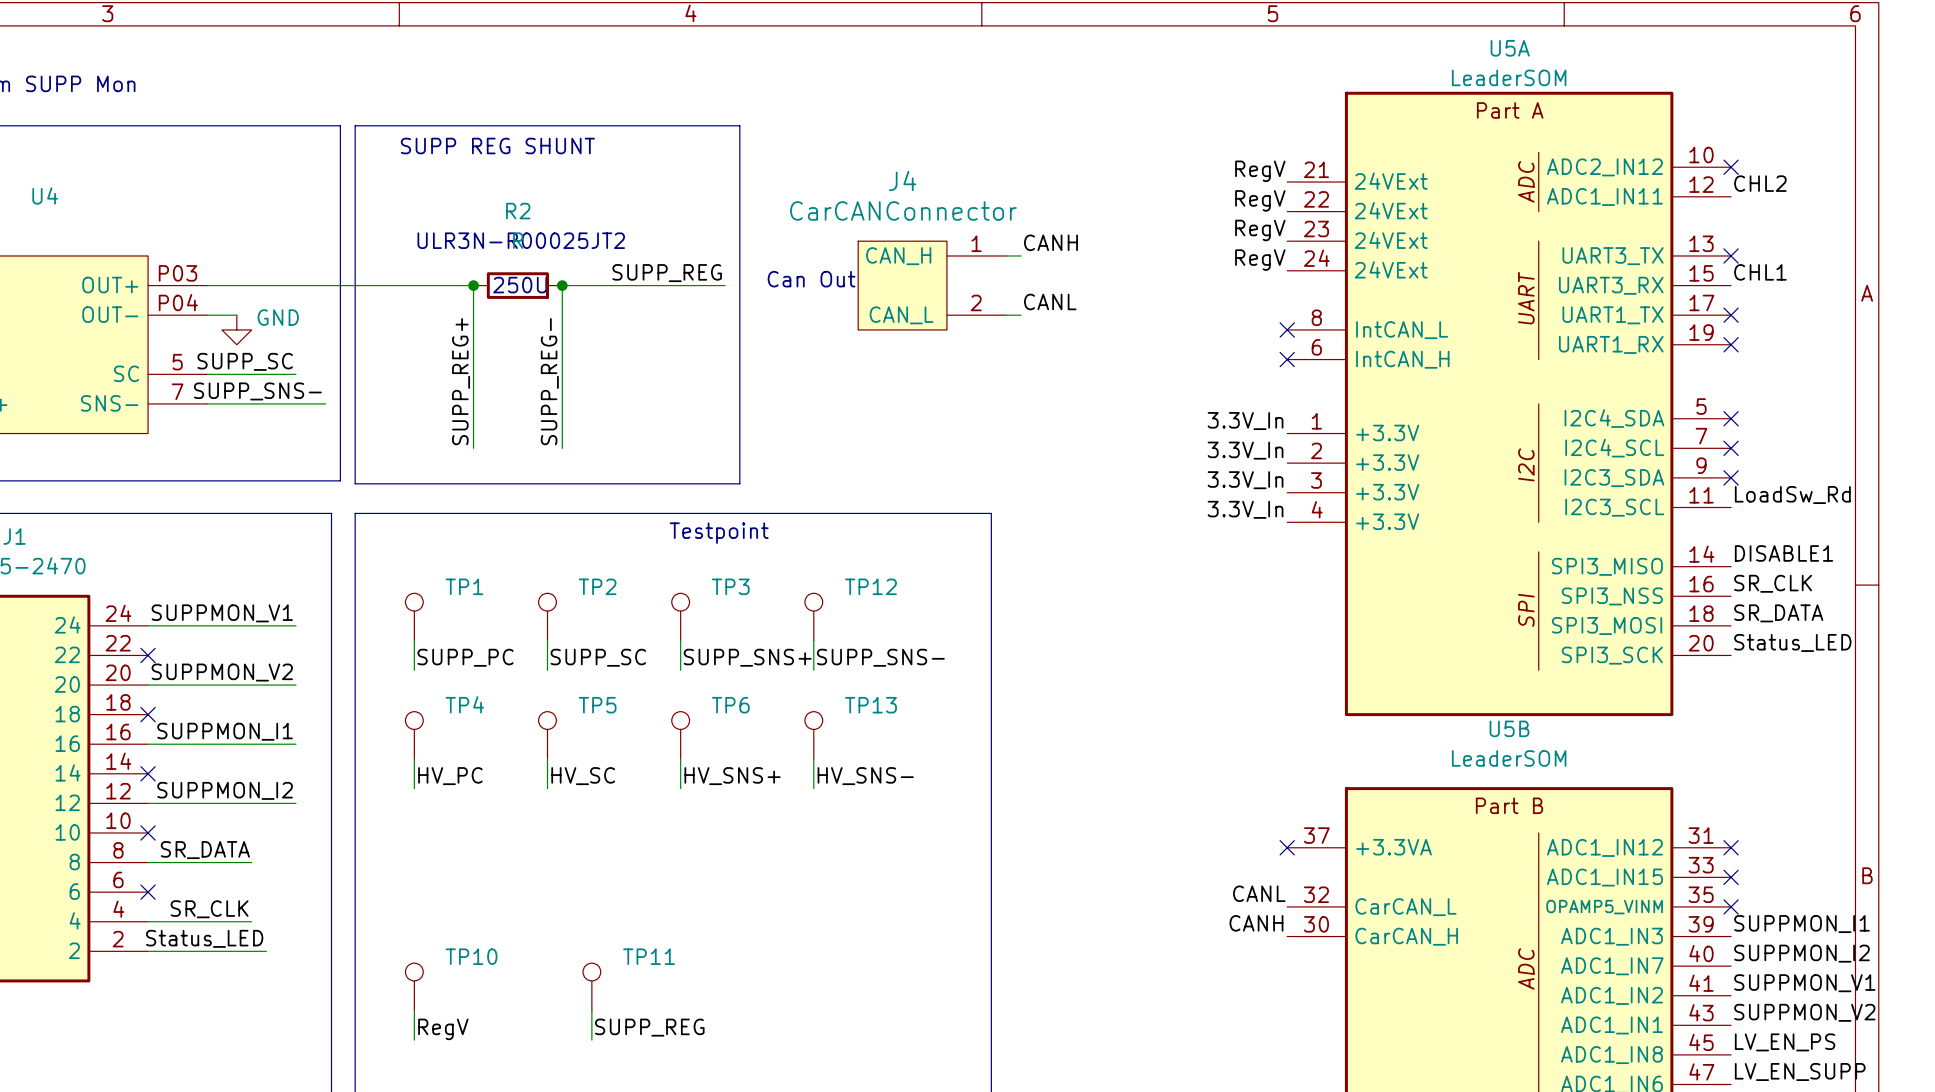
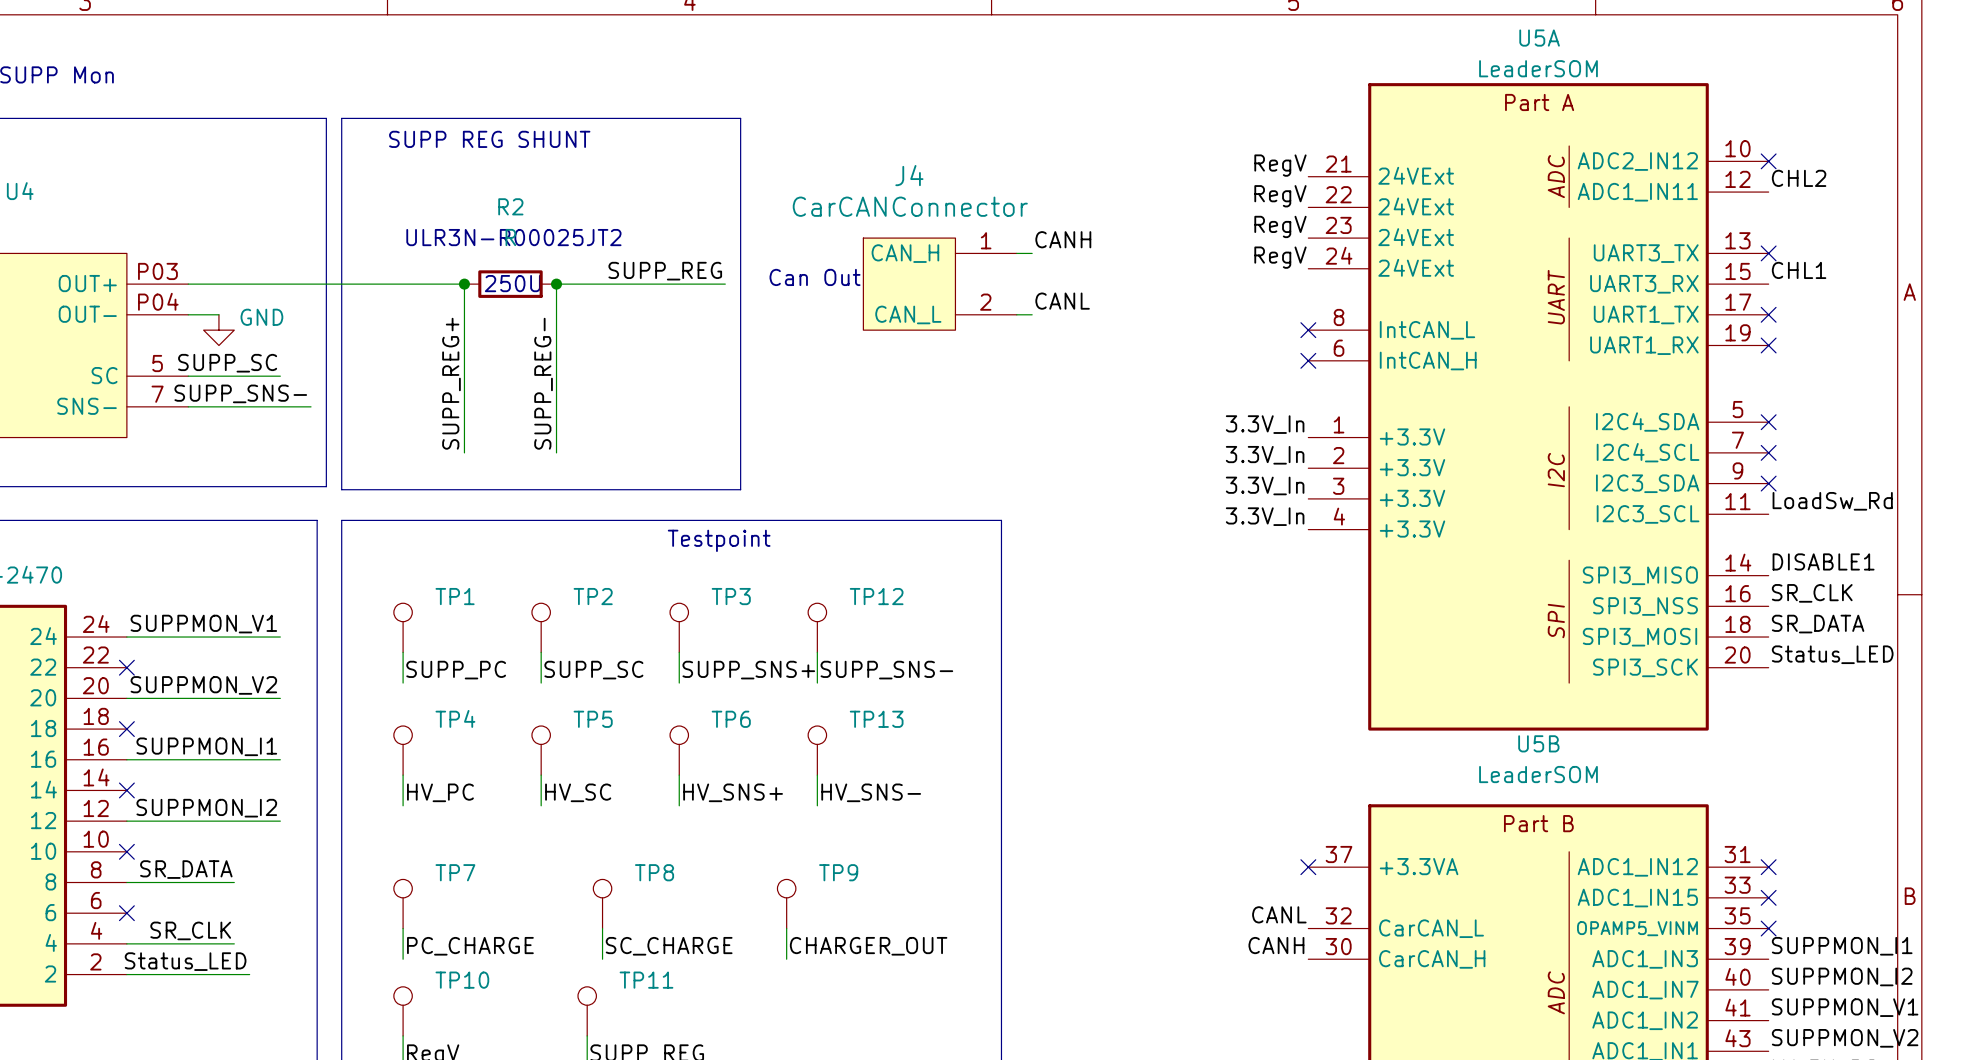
TP7: none -> (403, 903)
TP8: none -> (602, 903)
TP9: none -> (786, 903)
wire: none -> (403, 928) (403, 959)
wire: none -> (602, 928) (602, 959)
wire: none -> (786, 928) (786, 959)
label: none -> PC_CHARGE (470, 946)
label: none -> SC_CHARGE (669, 946)
label: none -> CHARGER_OUT (868, 946)

